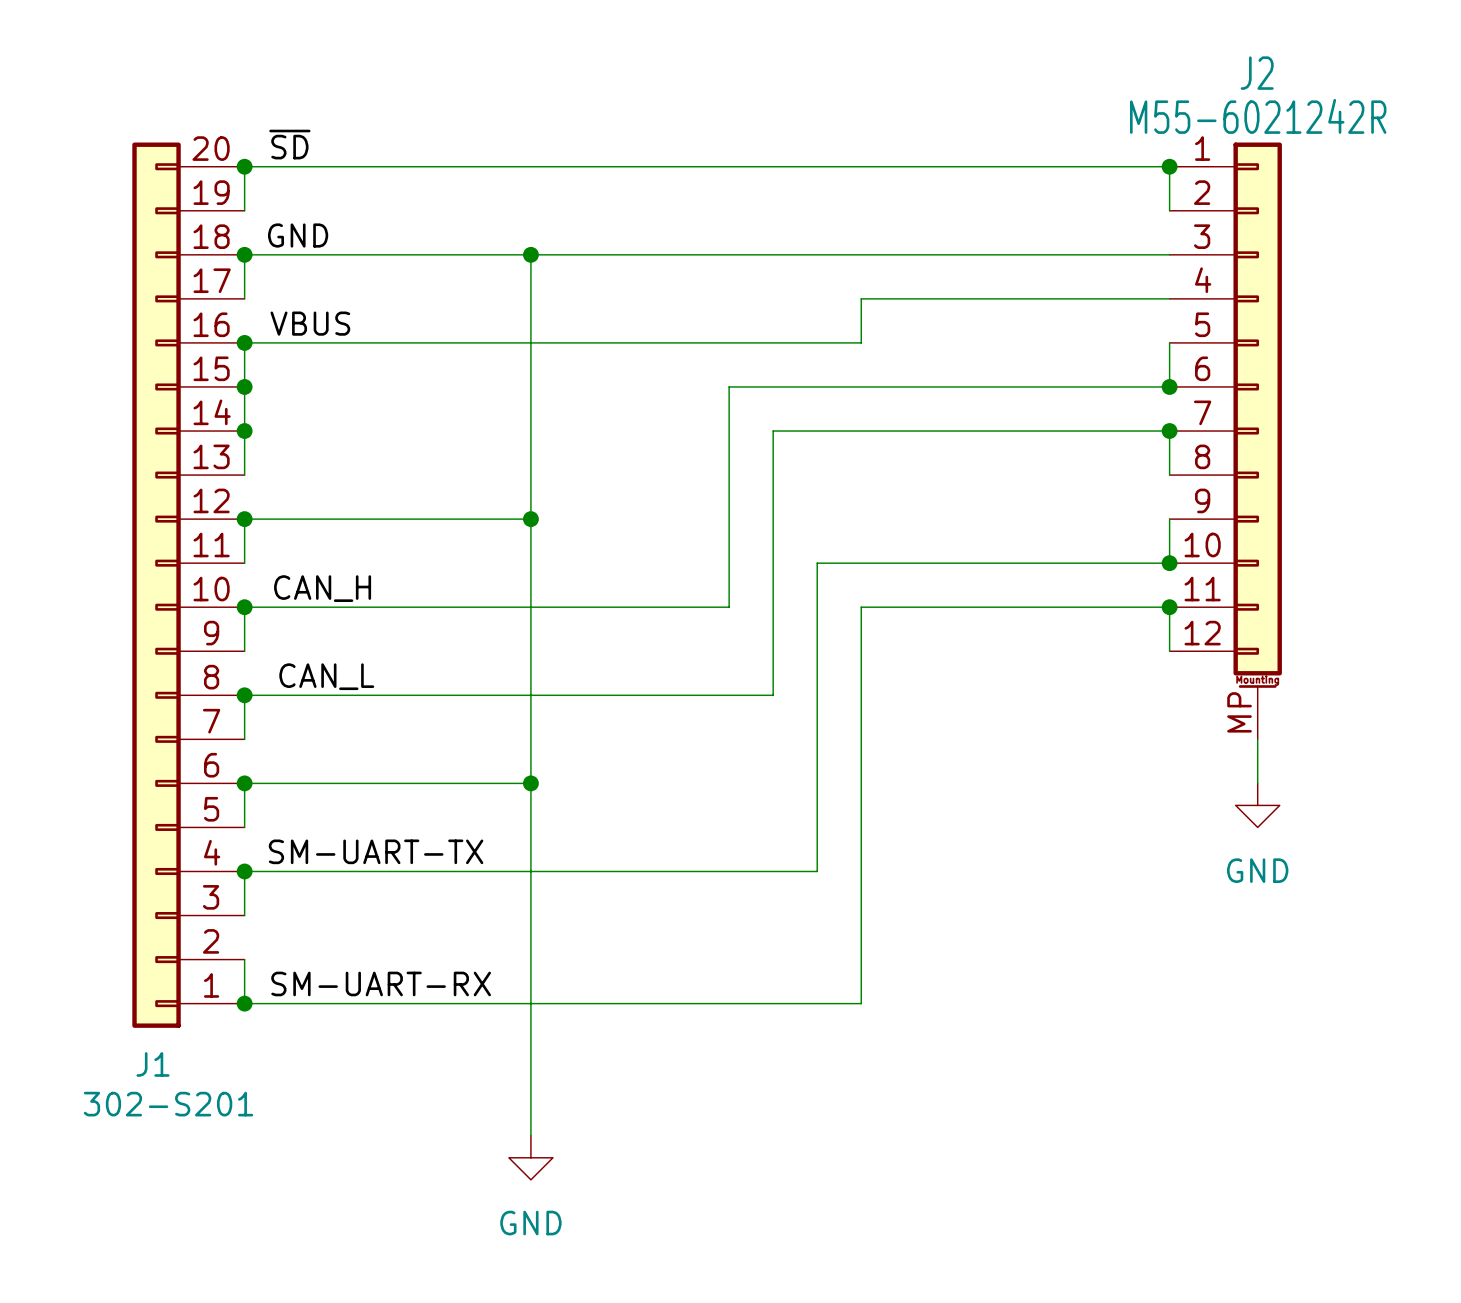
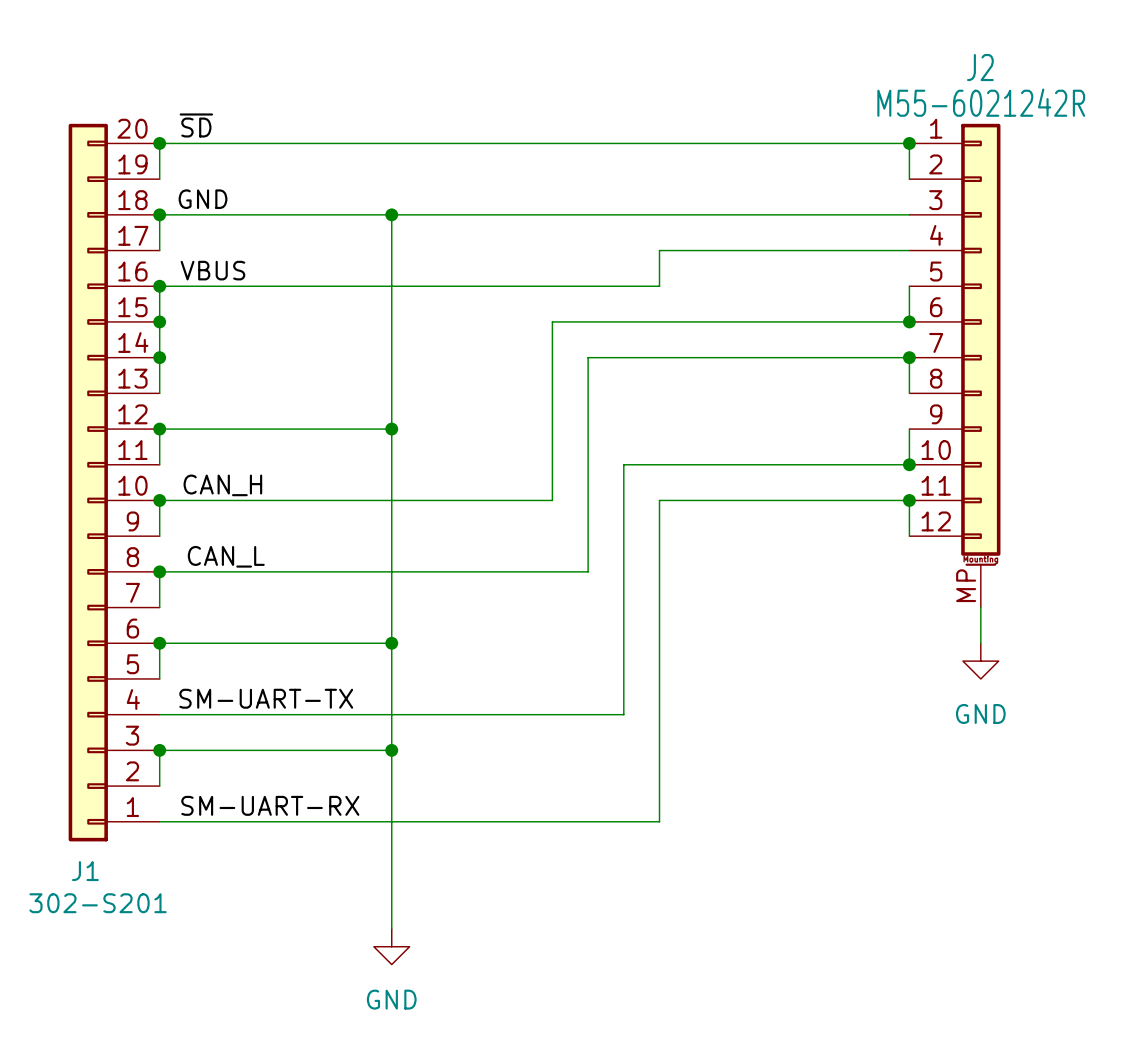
wire: (244, 871) (244, 915) -> none
junction: (244, 871) -> none
junction: none -> (159, 750)
junction: none -> (391, 750)
wire: (244, 959) (244, 1003) -> (159, 786) (159, 750) (391, 750)
junction: (244, 1003) -> none

